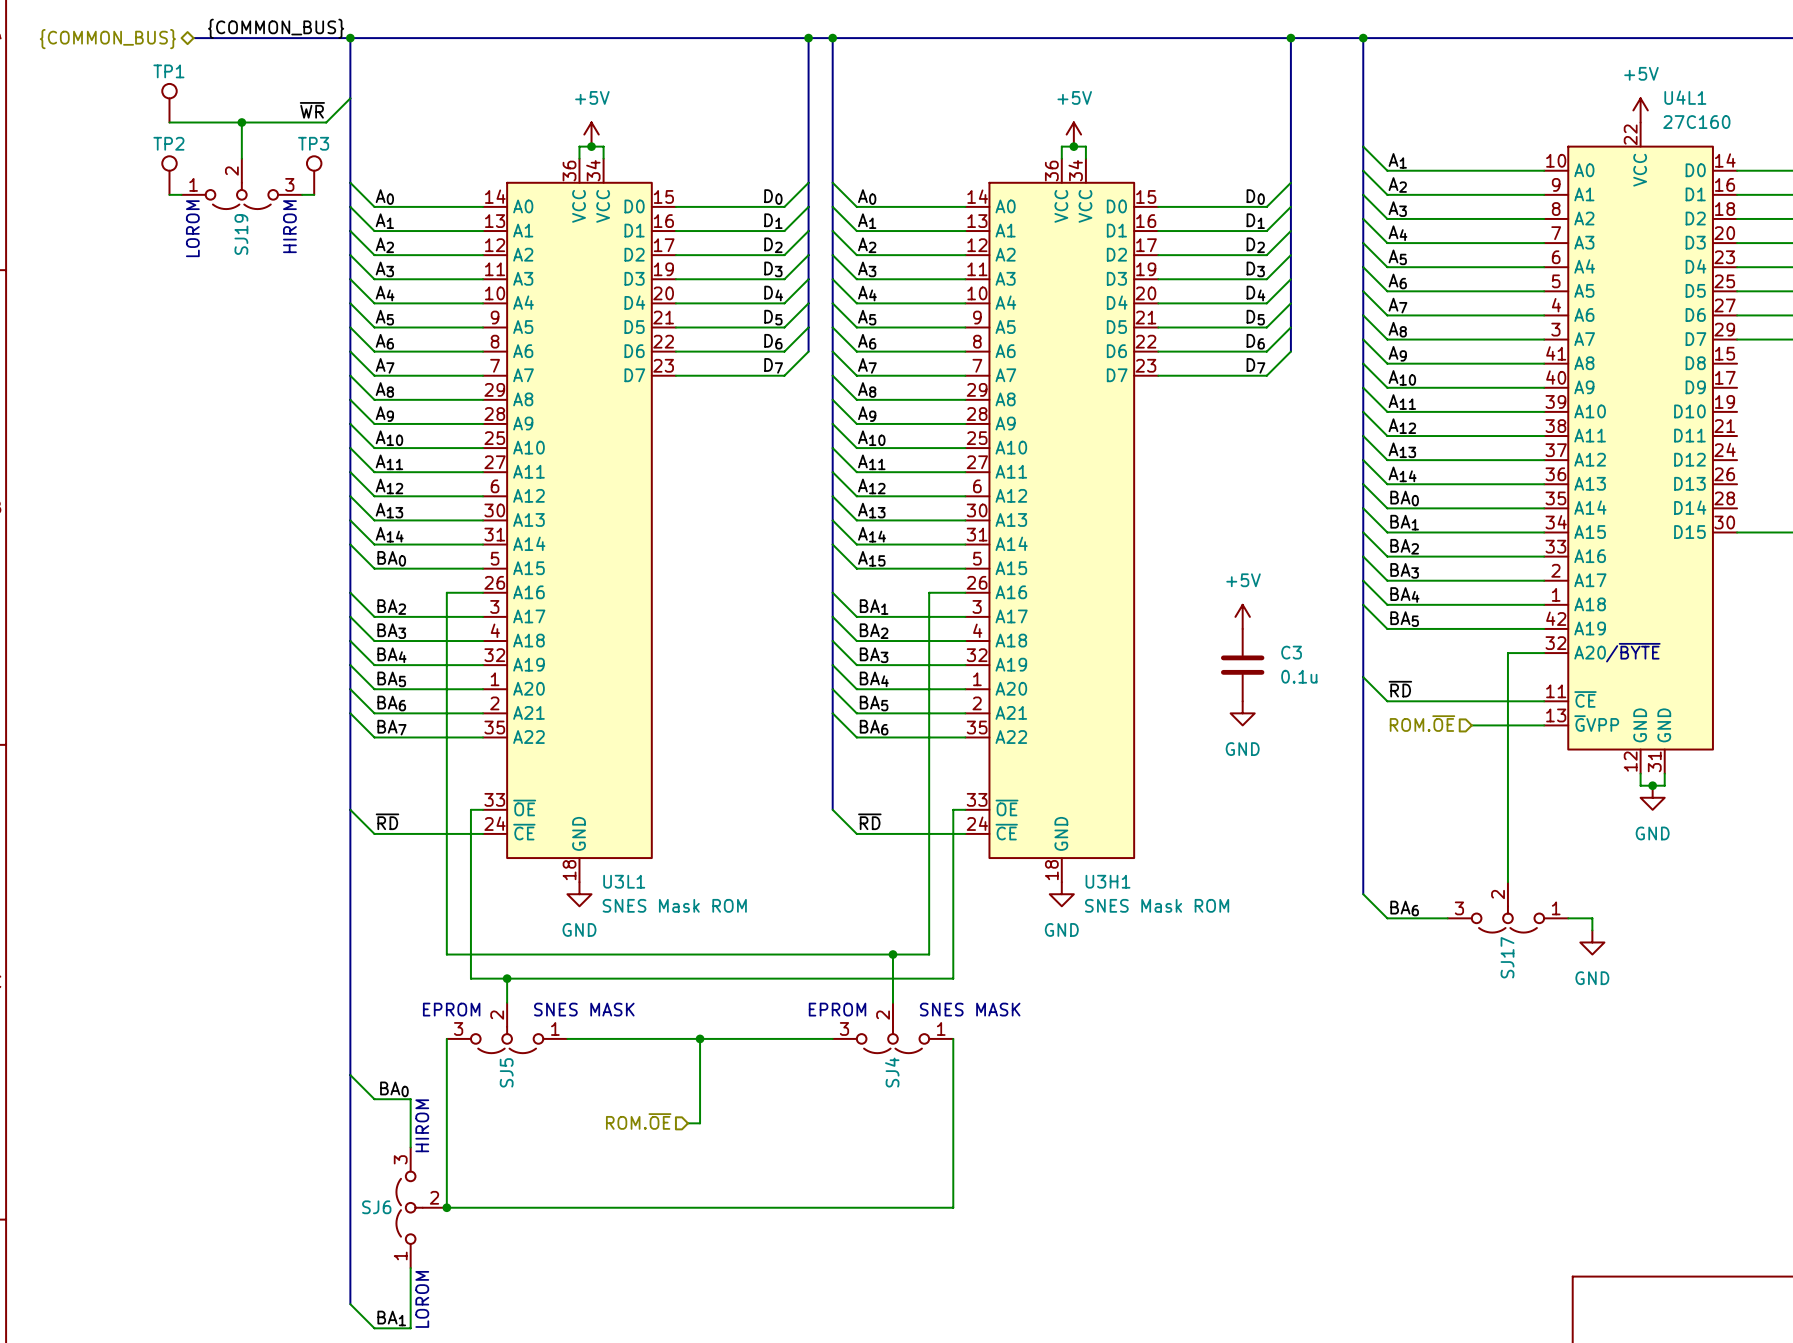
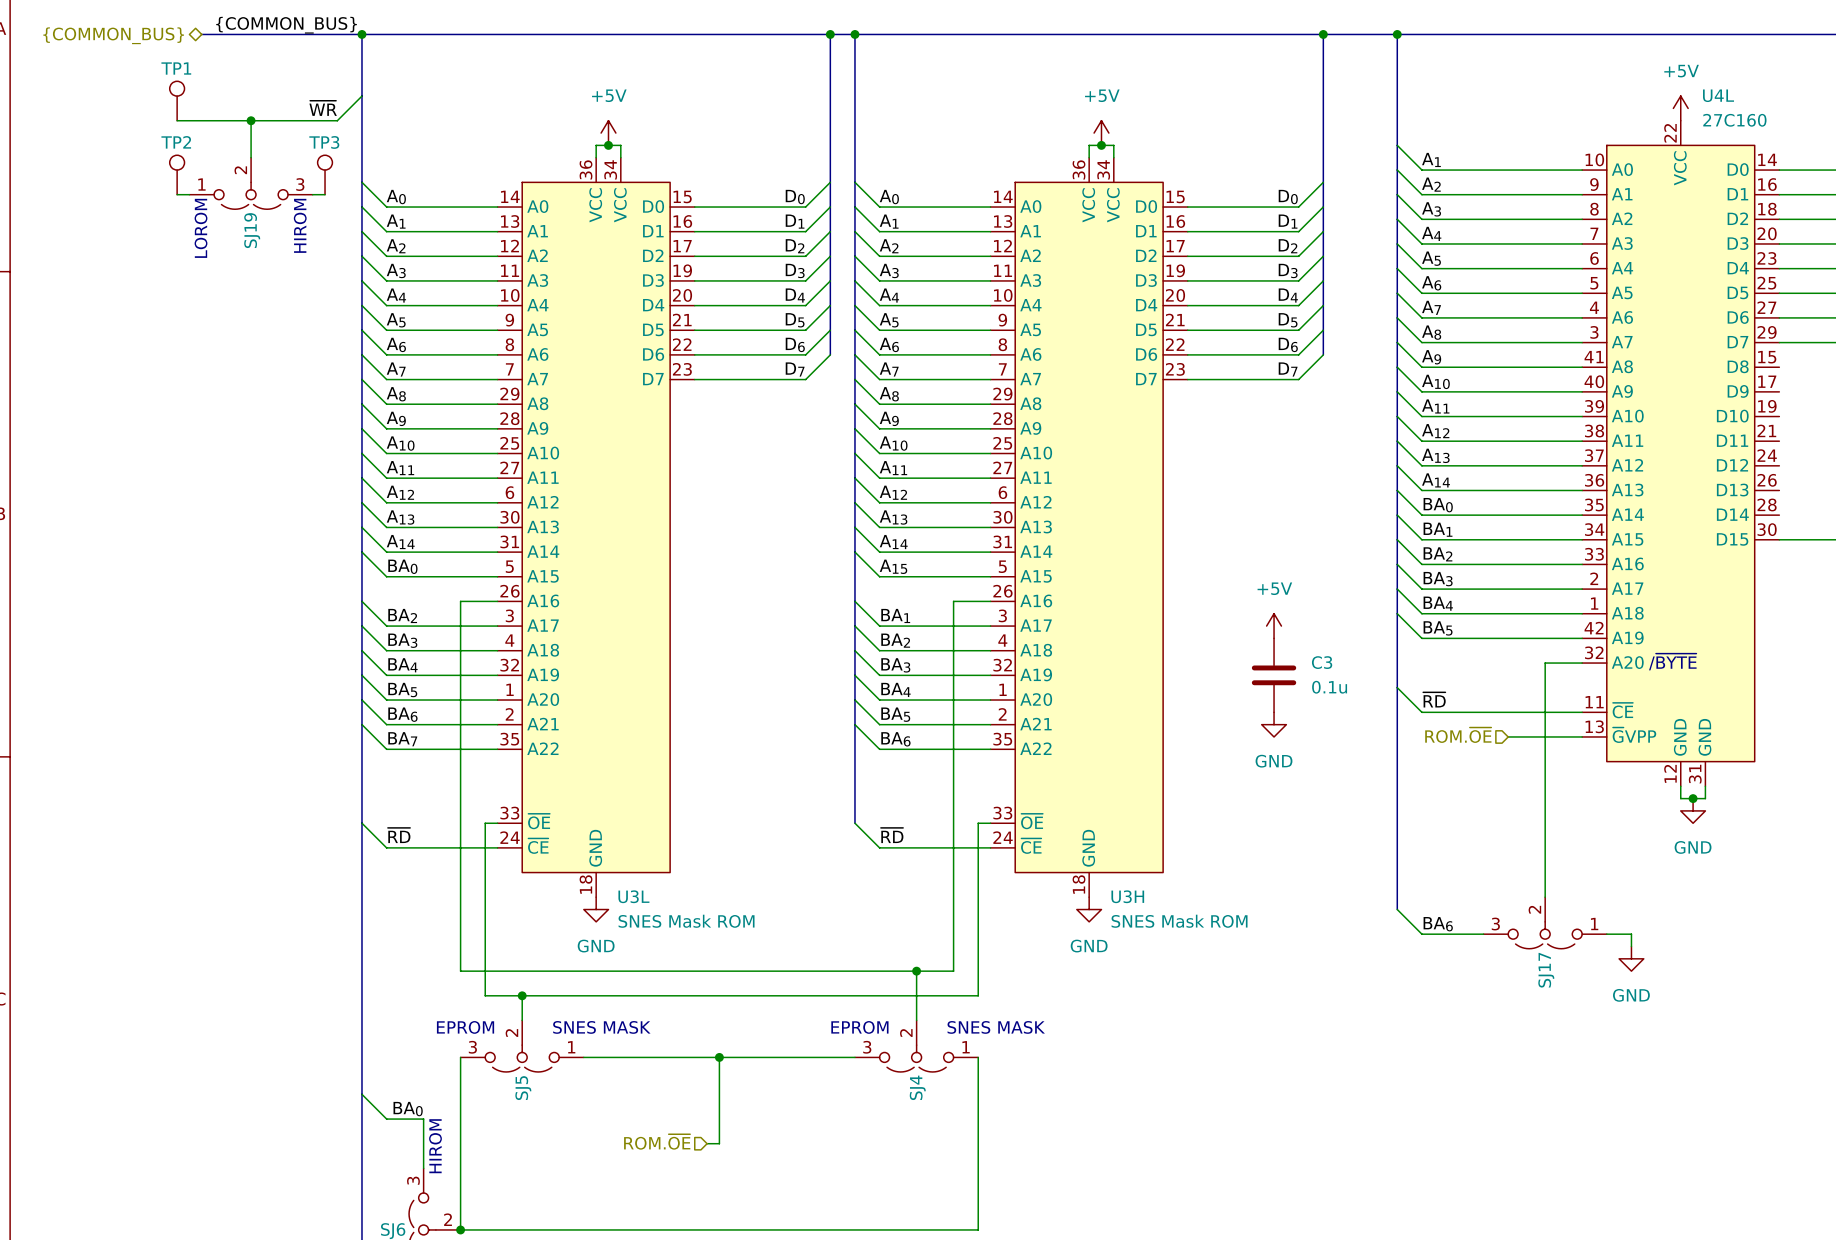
U4L1 name: U4L1 (1685, 97) -> U4L (1718, 95)
U3L1 name: U3L1 (624, 881) -> U3L (633, 896)
U3H1 name: U3H1 (1107, 881) -> U3H (1127, 896)

